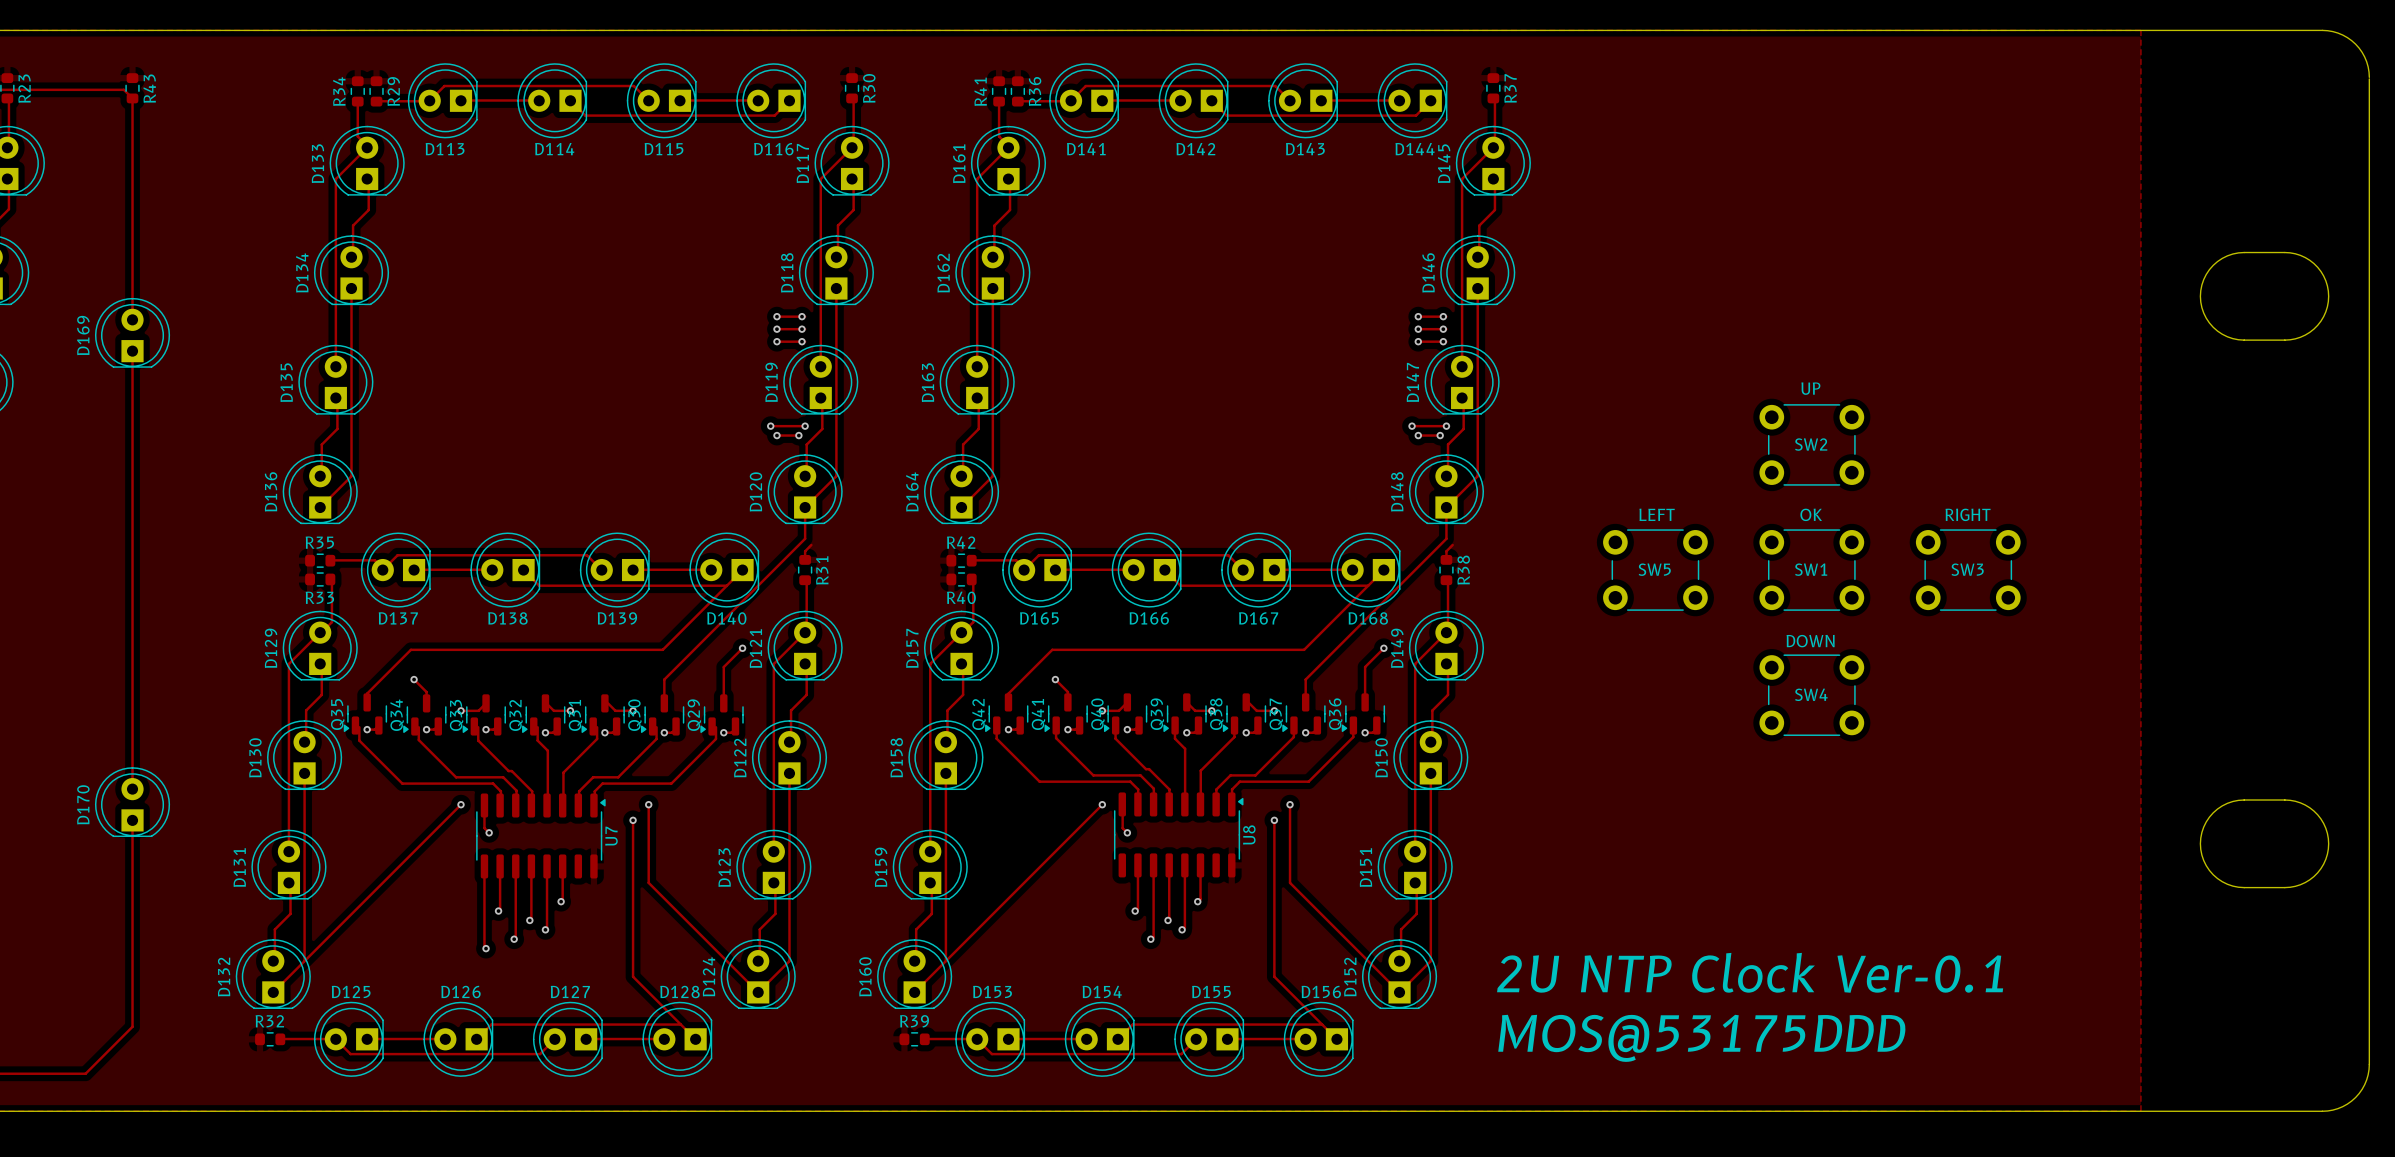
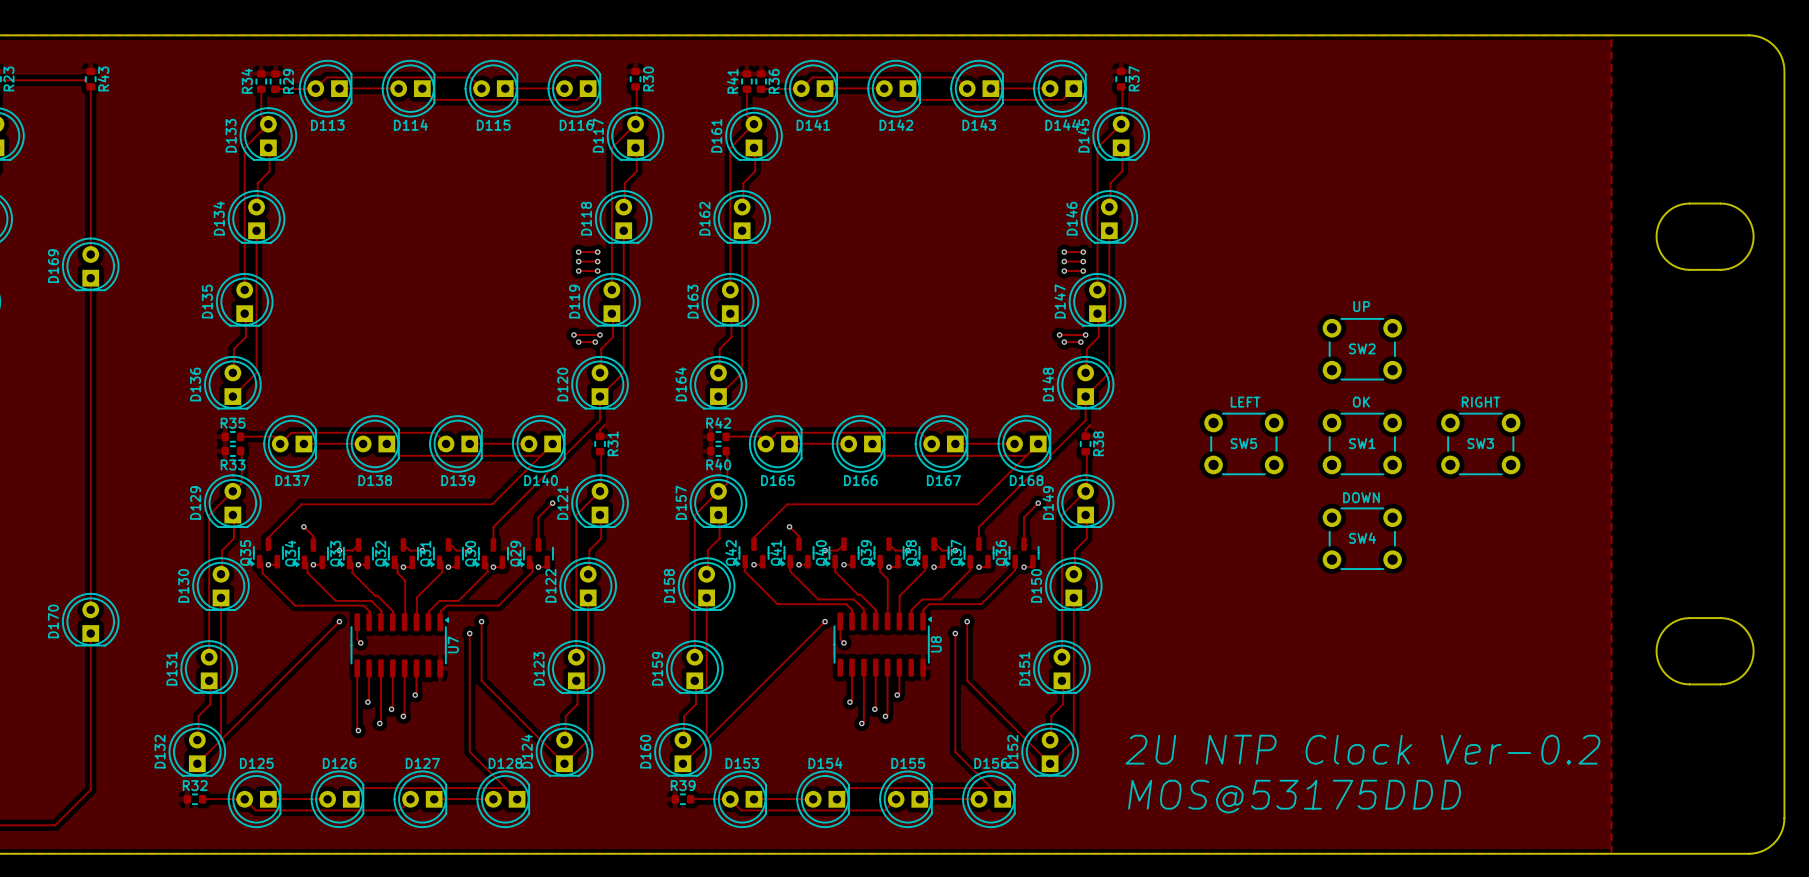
text: 2U NTP Clock Ver-0.1 (1750, 972) -> 2U NTP Clock Ver-0.2 (1362, 749)

